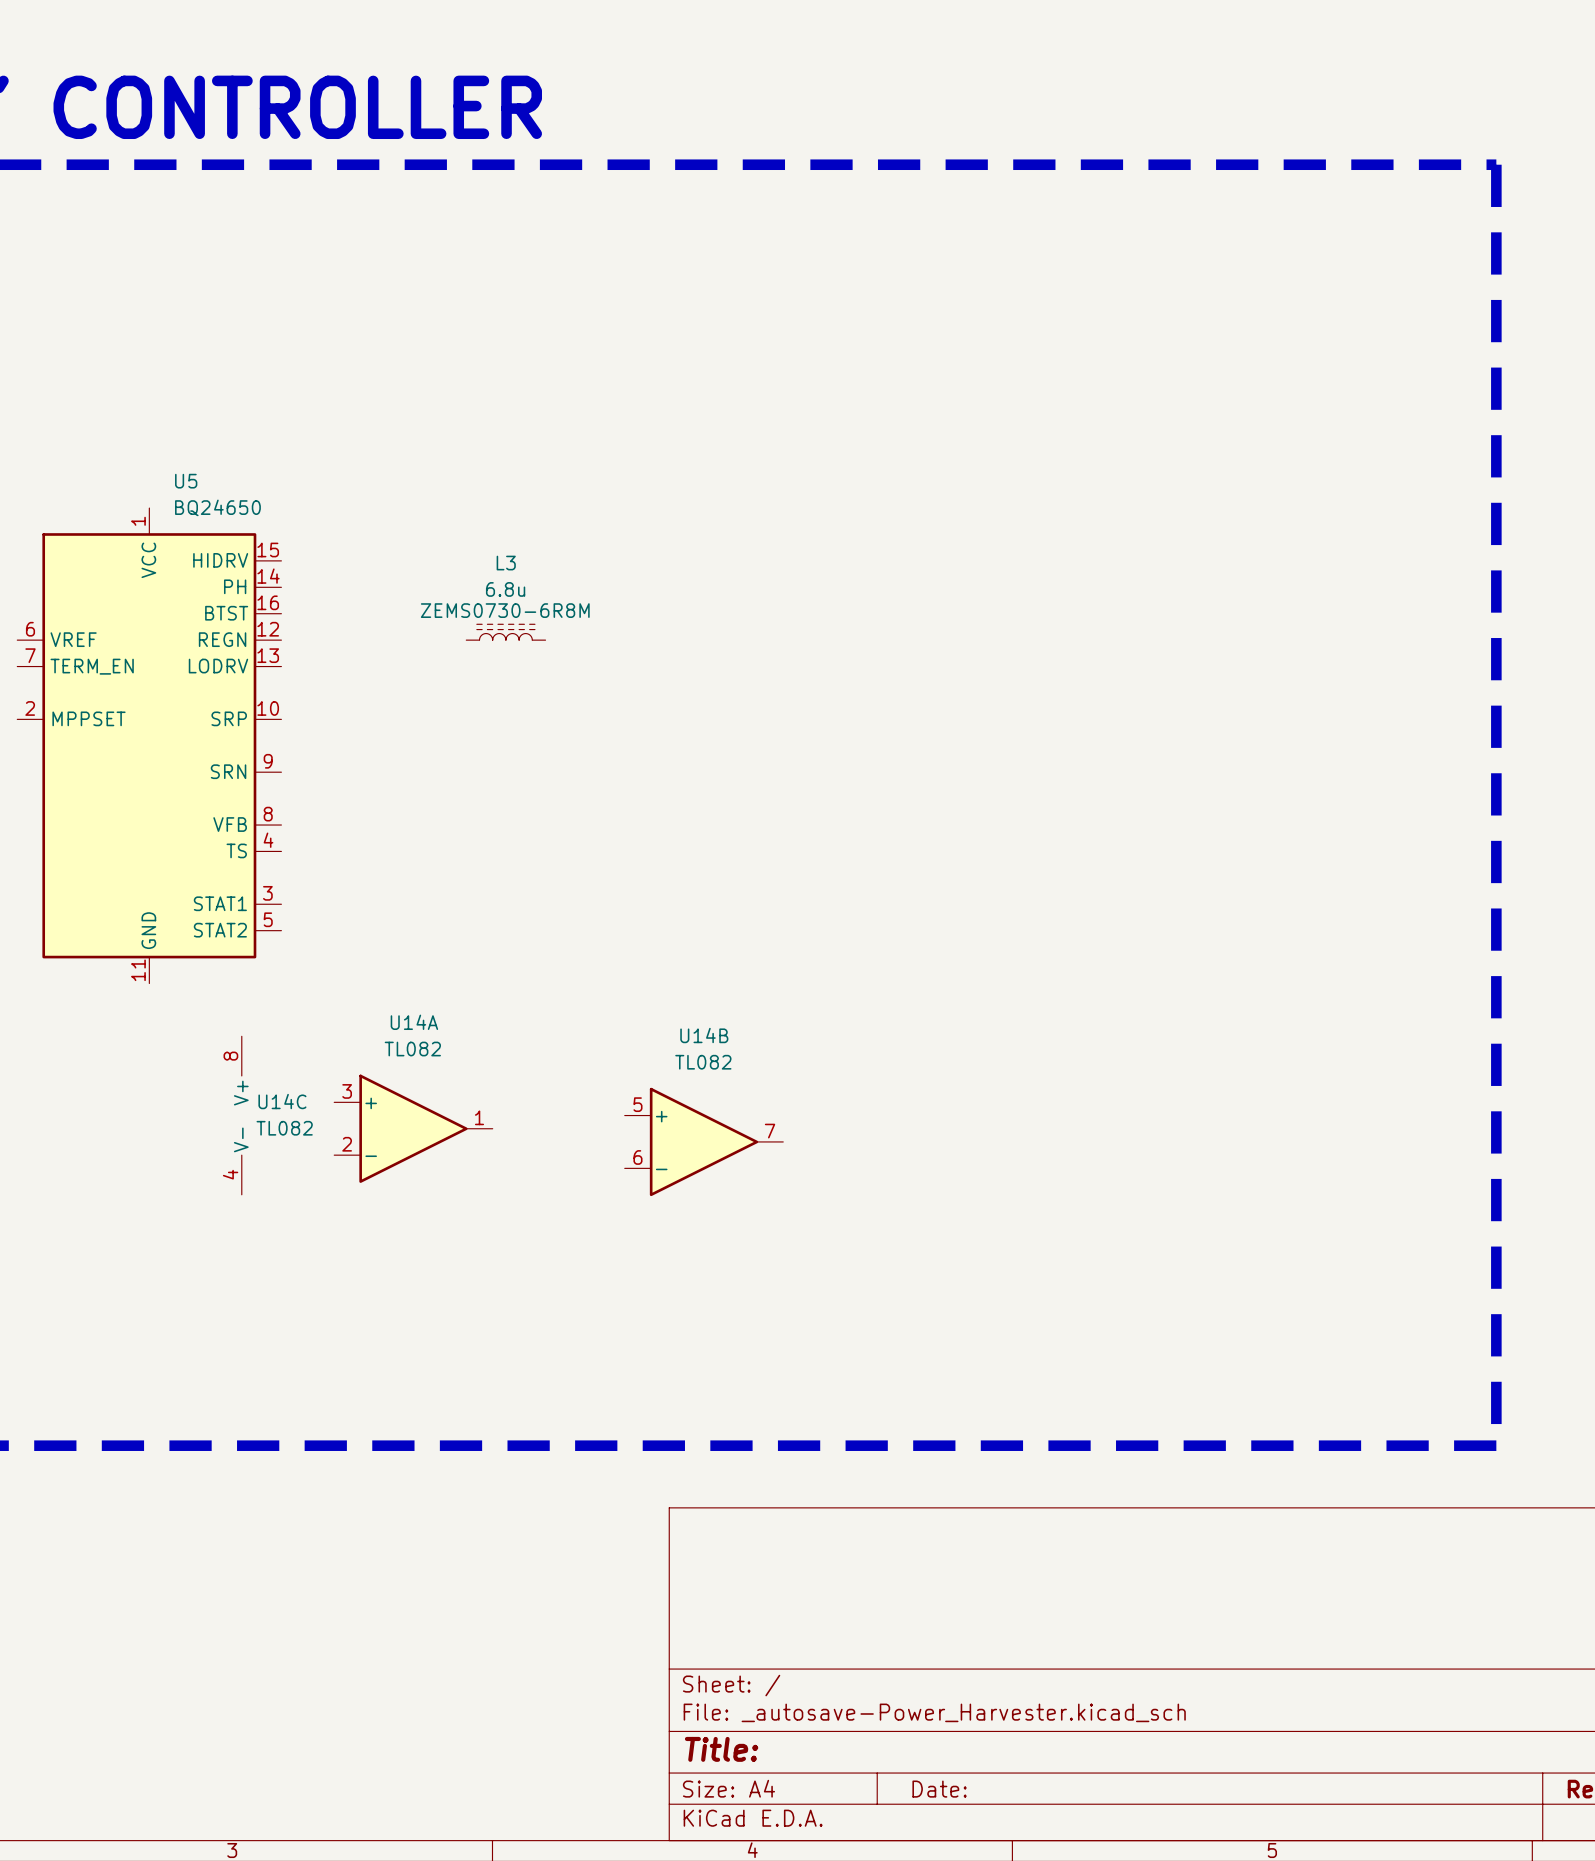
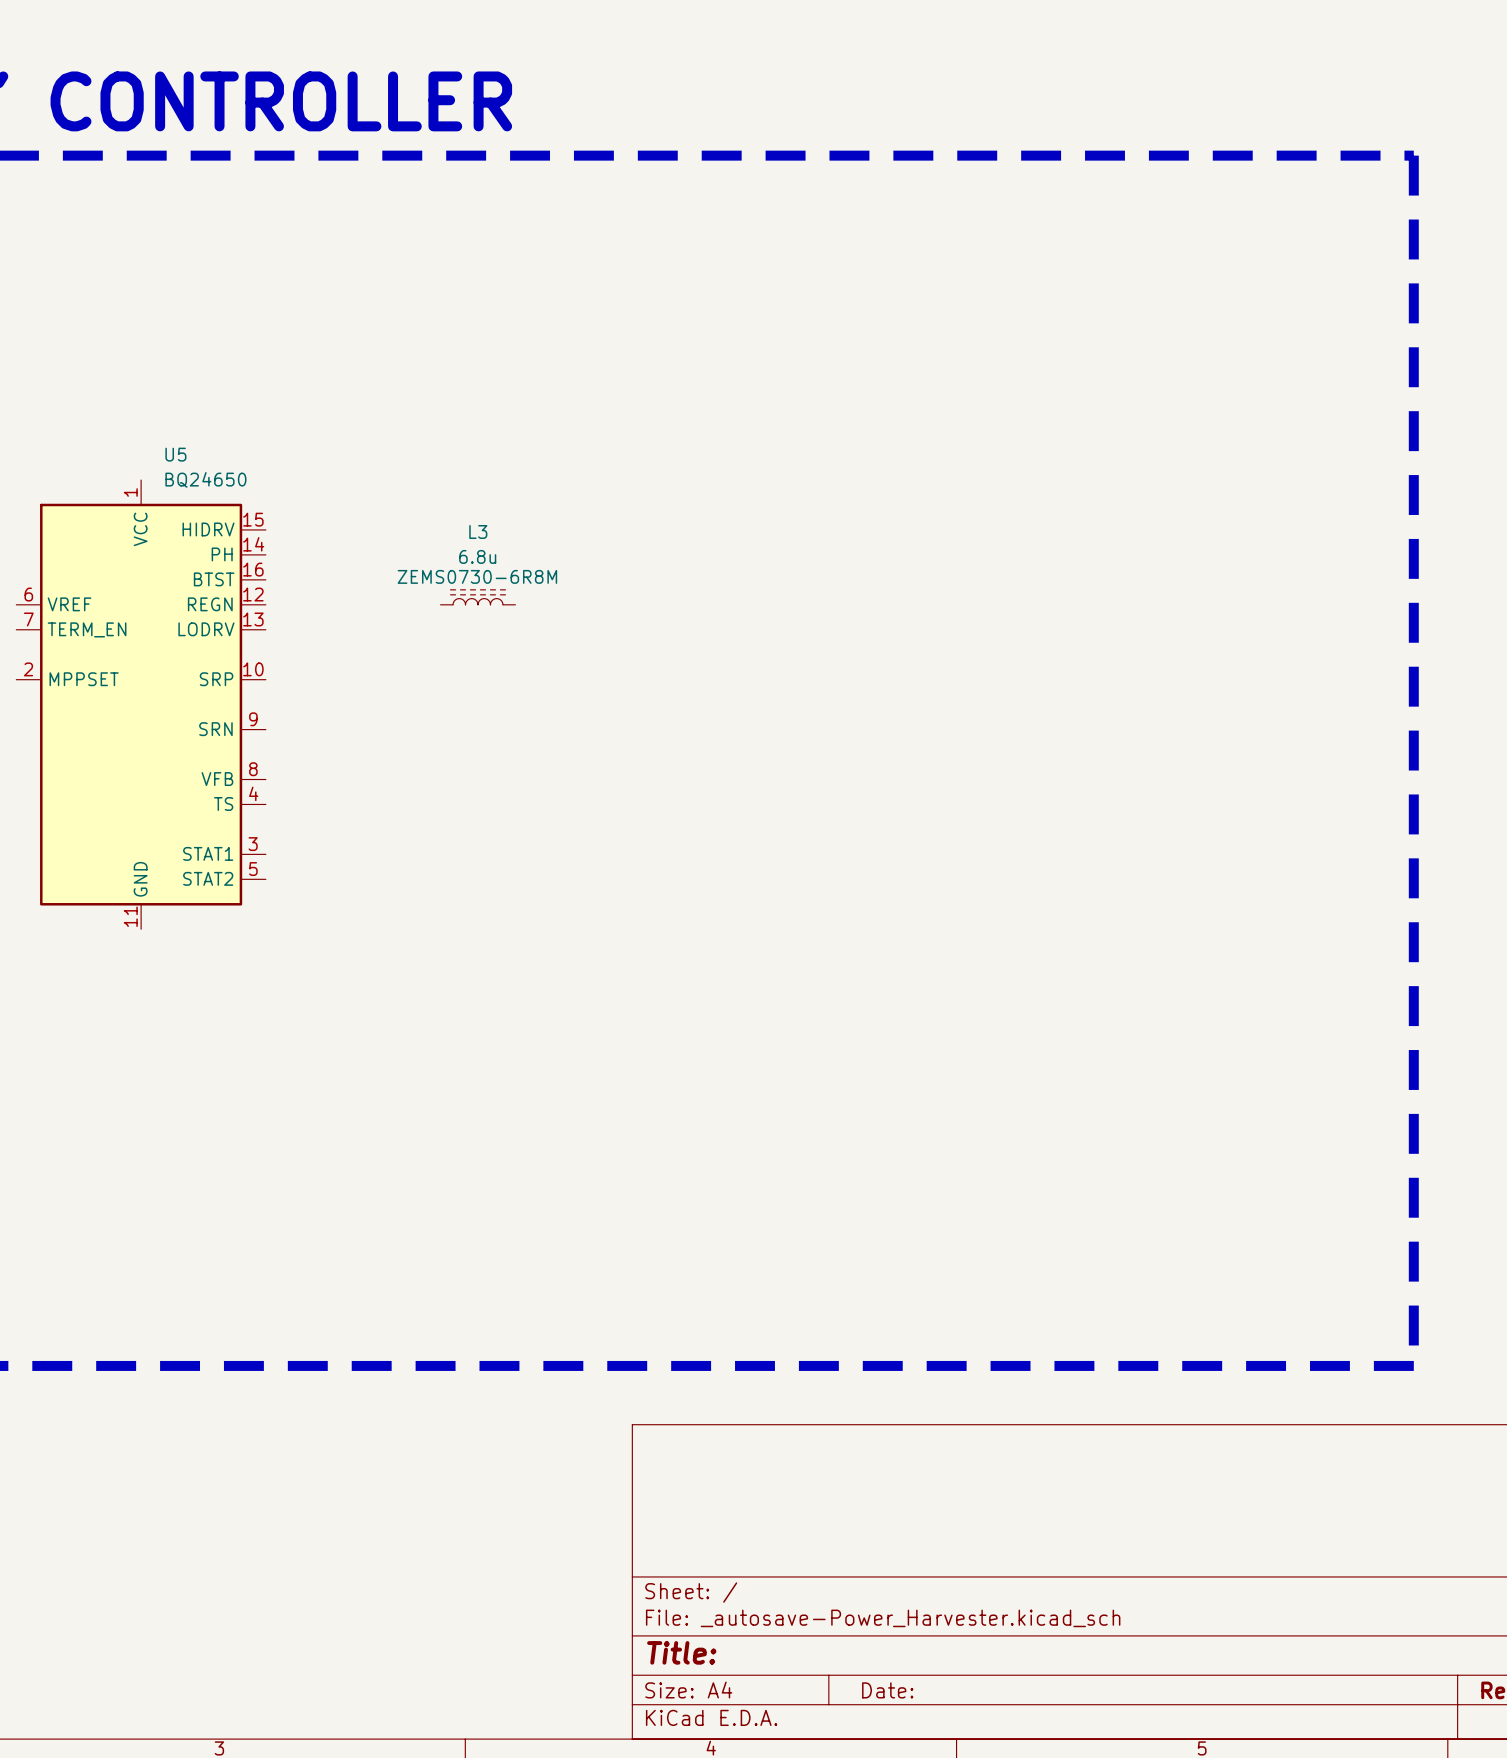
U14C: TL082 (241, 1115) -> none
U14A: TL082 (413, 1128) -> none
U14B: TL082 (703, 1141) -> none

